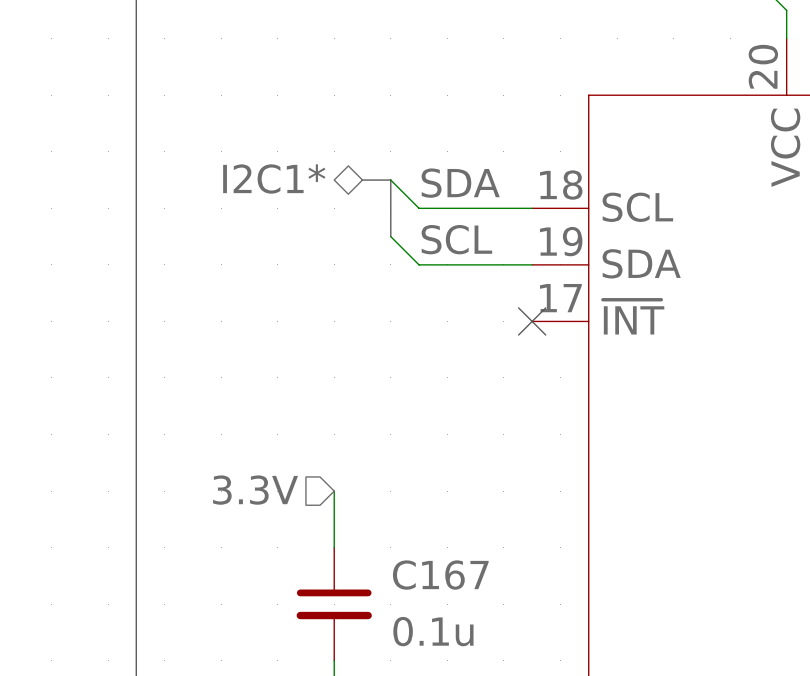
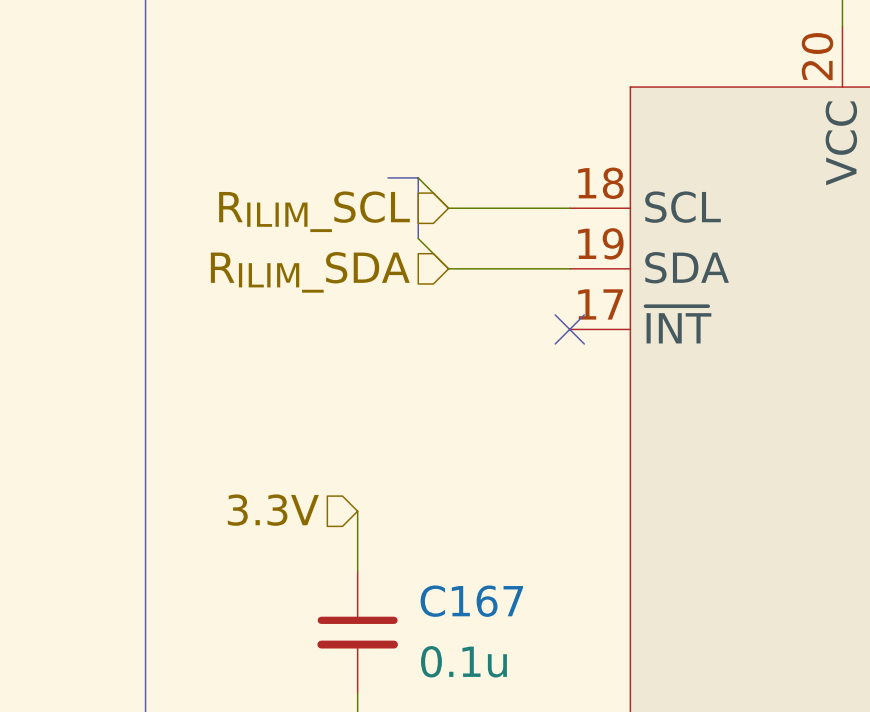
hierarchical label: I2C1* (274, 179) -> none
label: SDA (460, 183) -> none
hierarchical label: none -> RILIM_SCL (314, 211)
label: SCL (456, 239) -> none
hierarchical label: none -> RILIM_SDA (310, 272)

